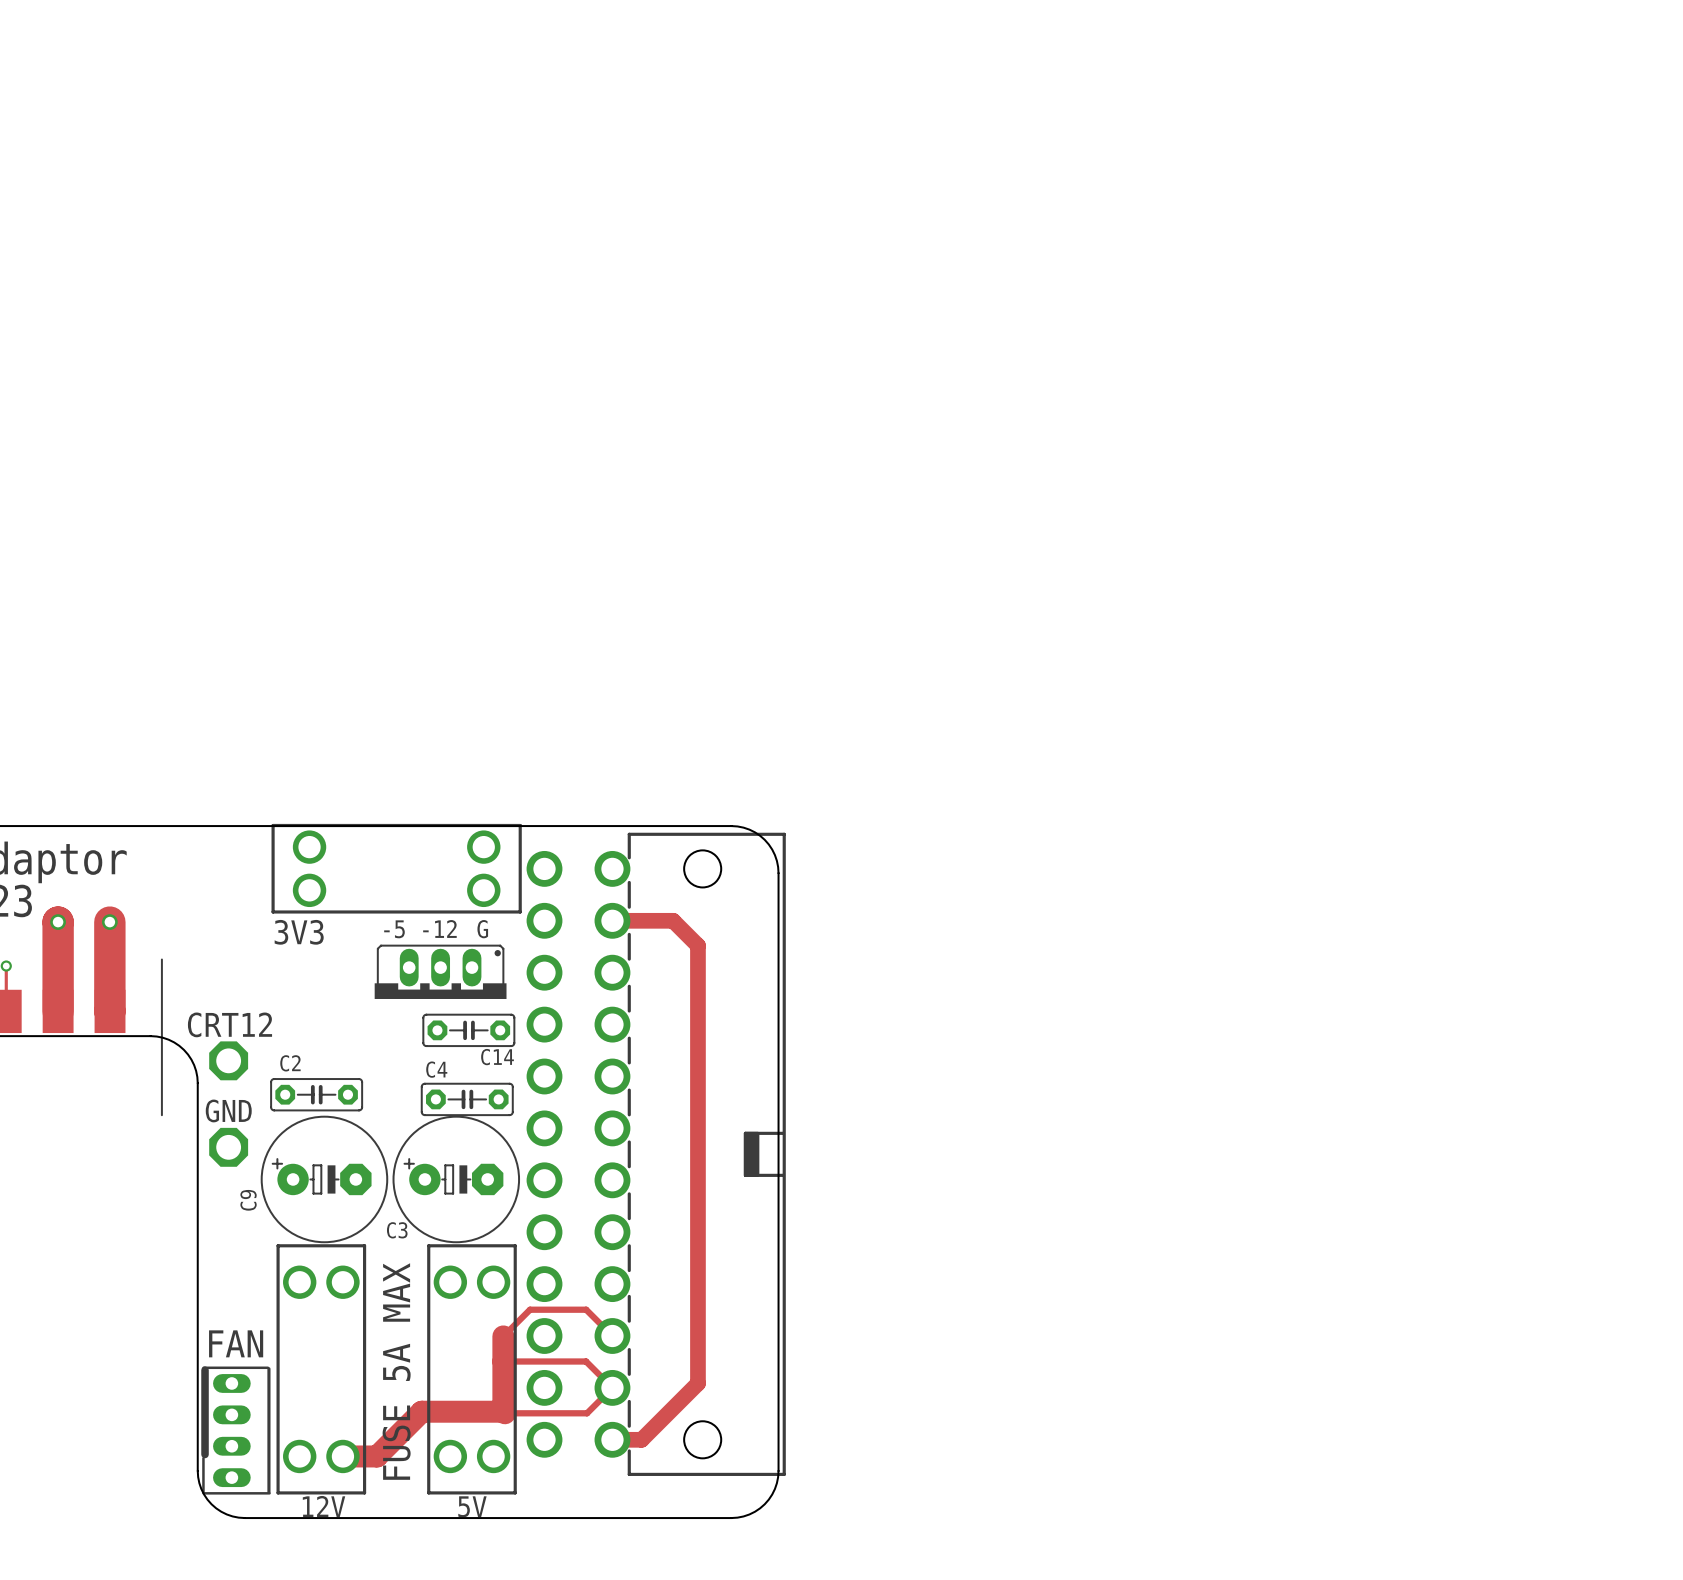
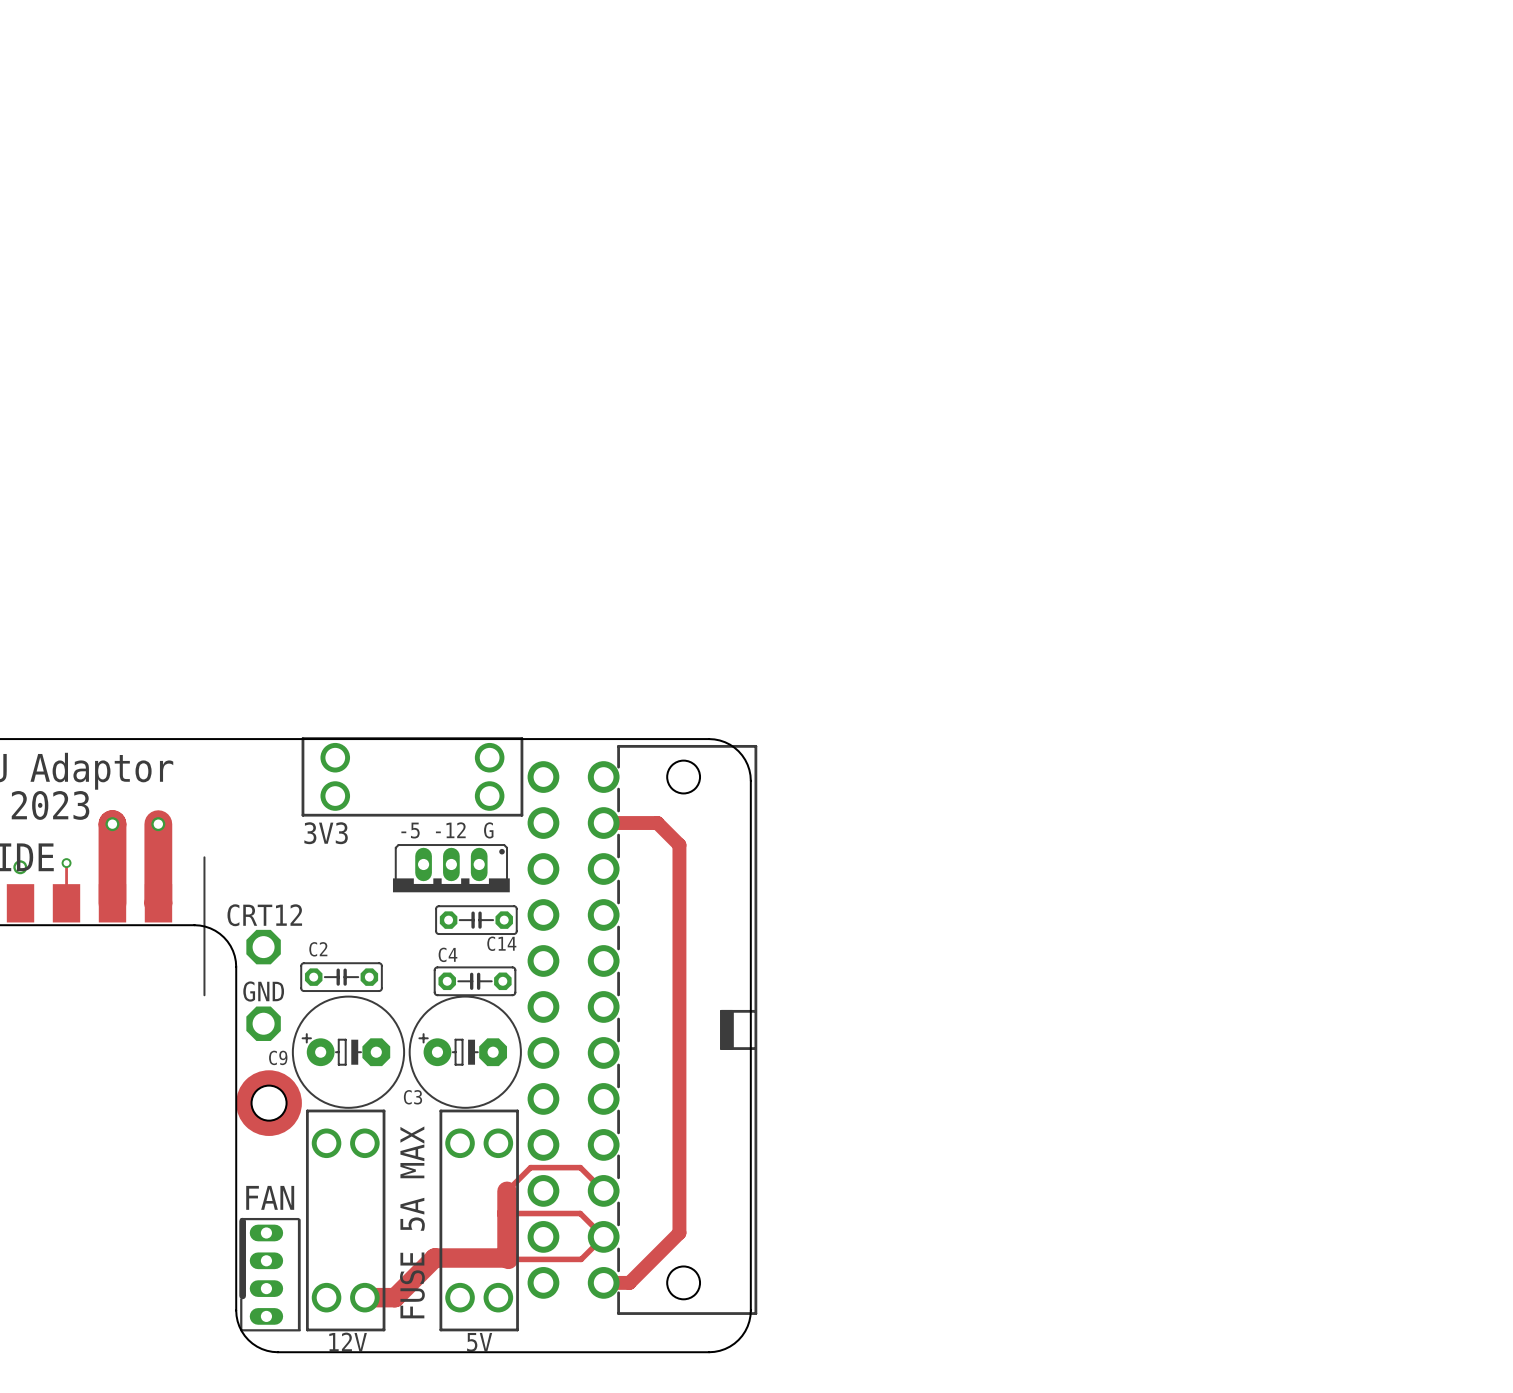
C9 name rotation: 0° (248, 1200) -> 90° clockwise (278, 1057)
part: none -> (269, 1103)

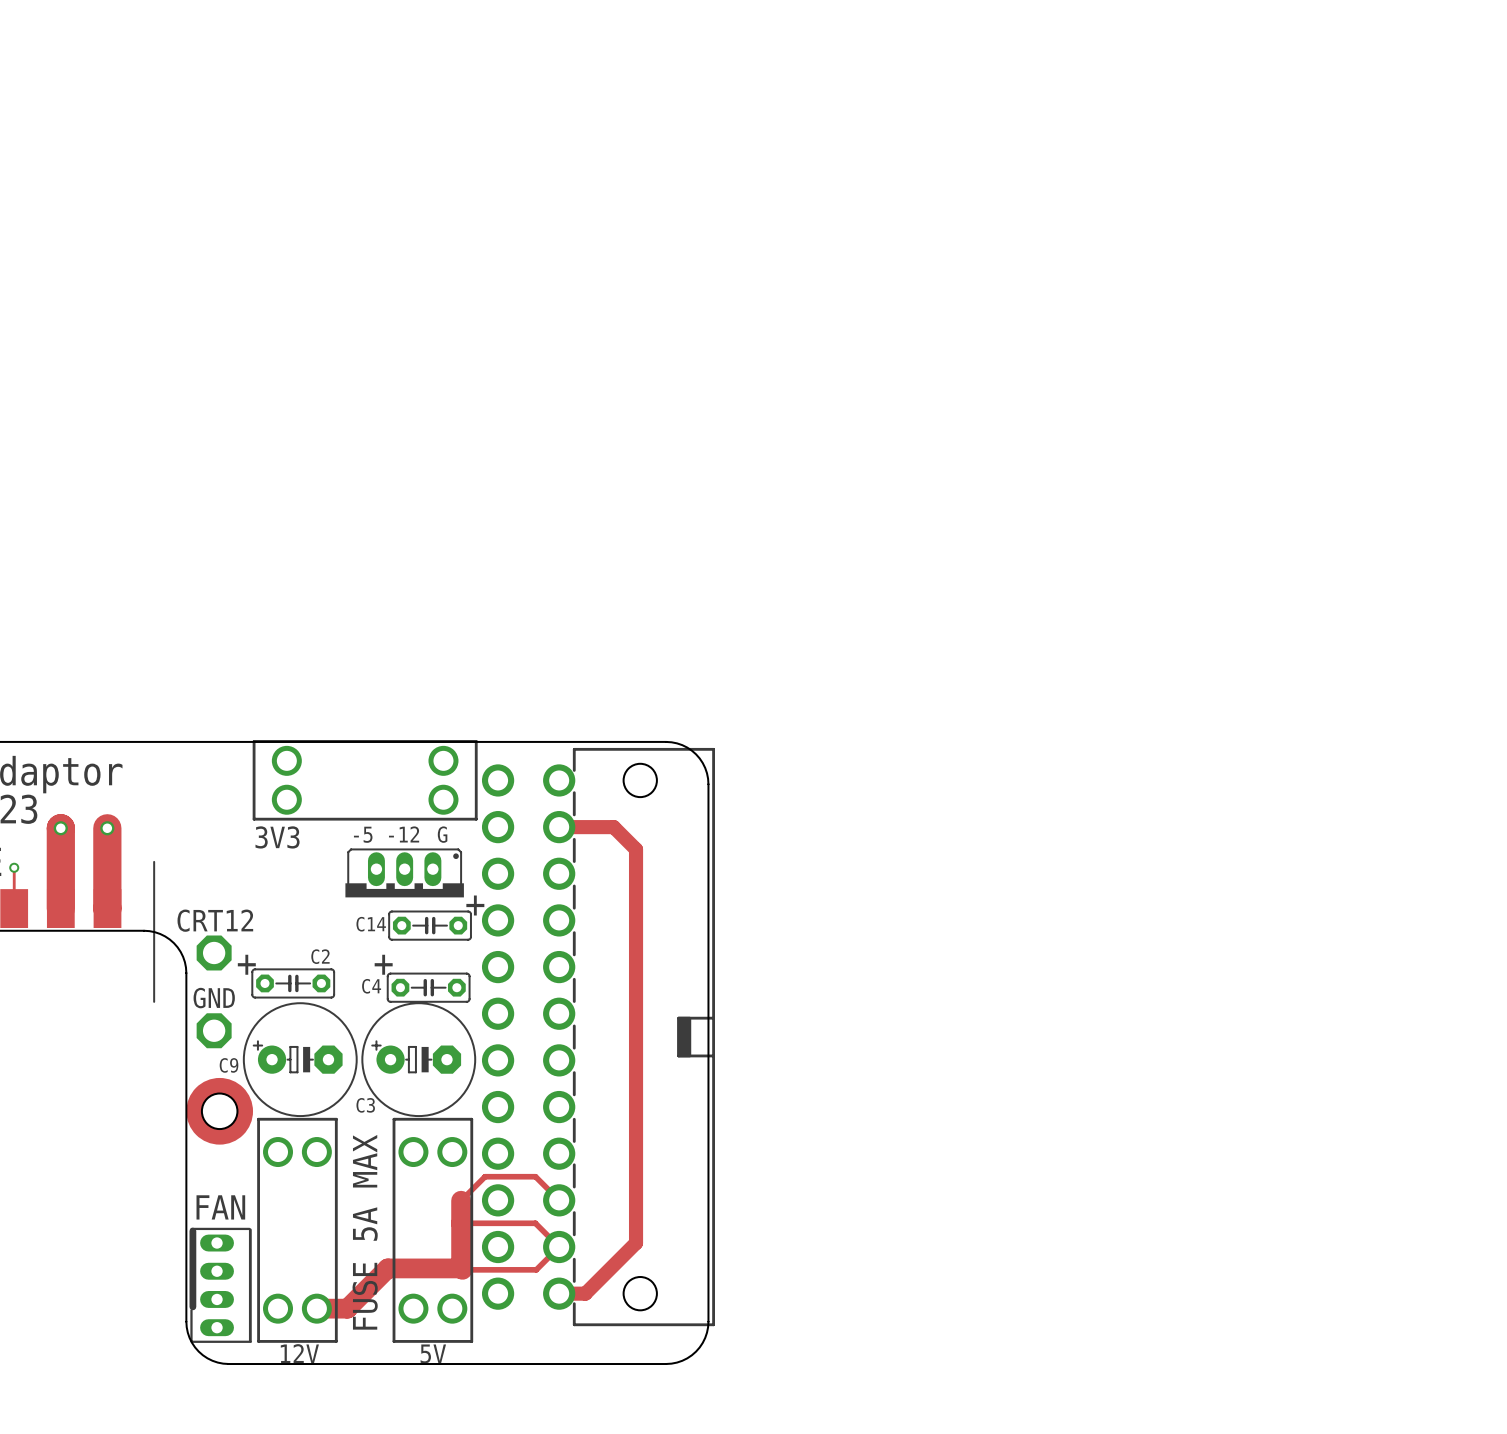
text: none -> + (475, 905)
C14 name position: C14 (501, 943) -> C14 (371, 924)
C2 name position: C2 (318, 949) -> C2 (320, 956)
C4 name position: C4 (447, 954) -> C4 (371, 986)
text: none -> + (246, 964)
text: none -> + (383, 964)

